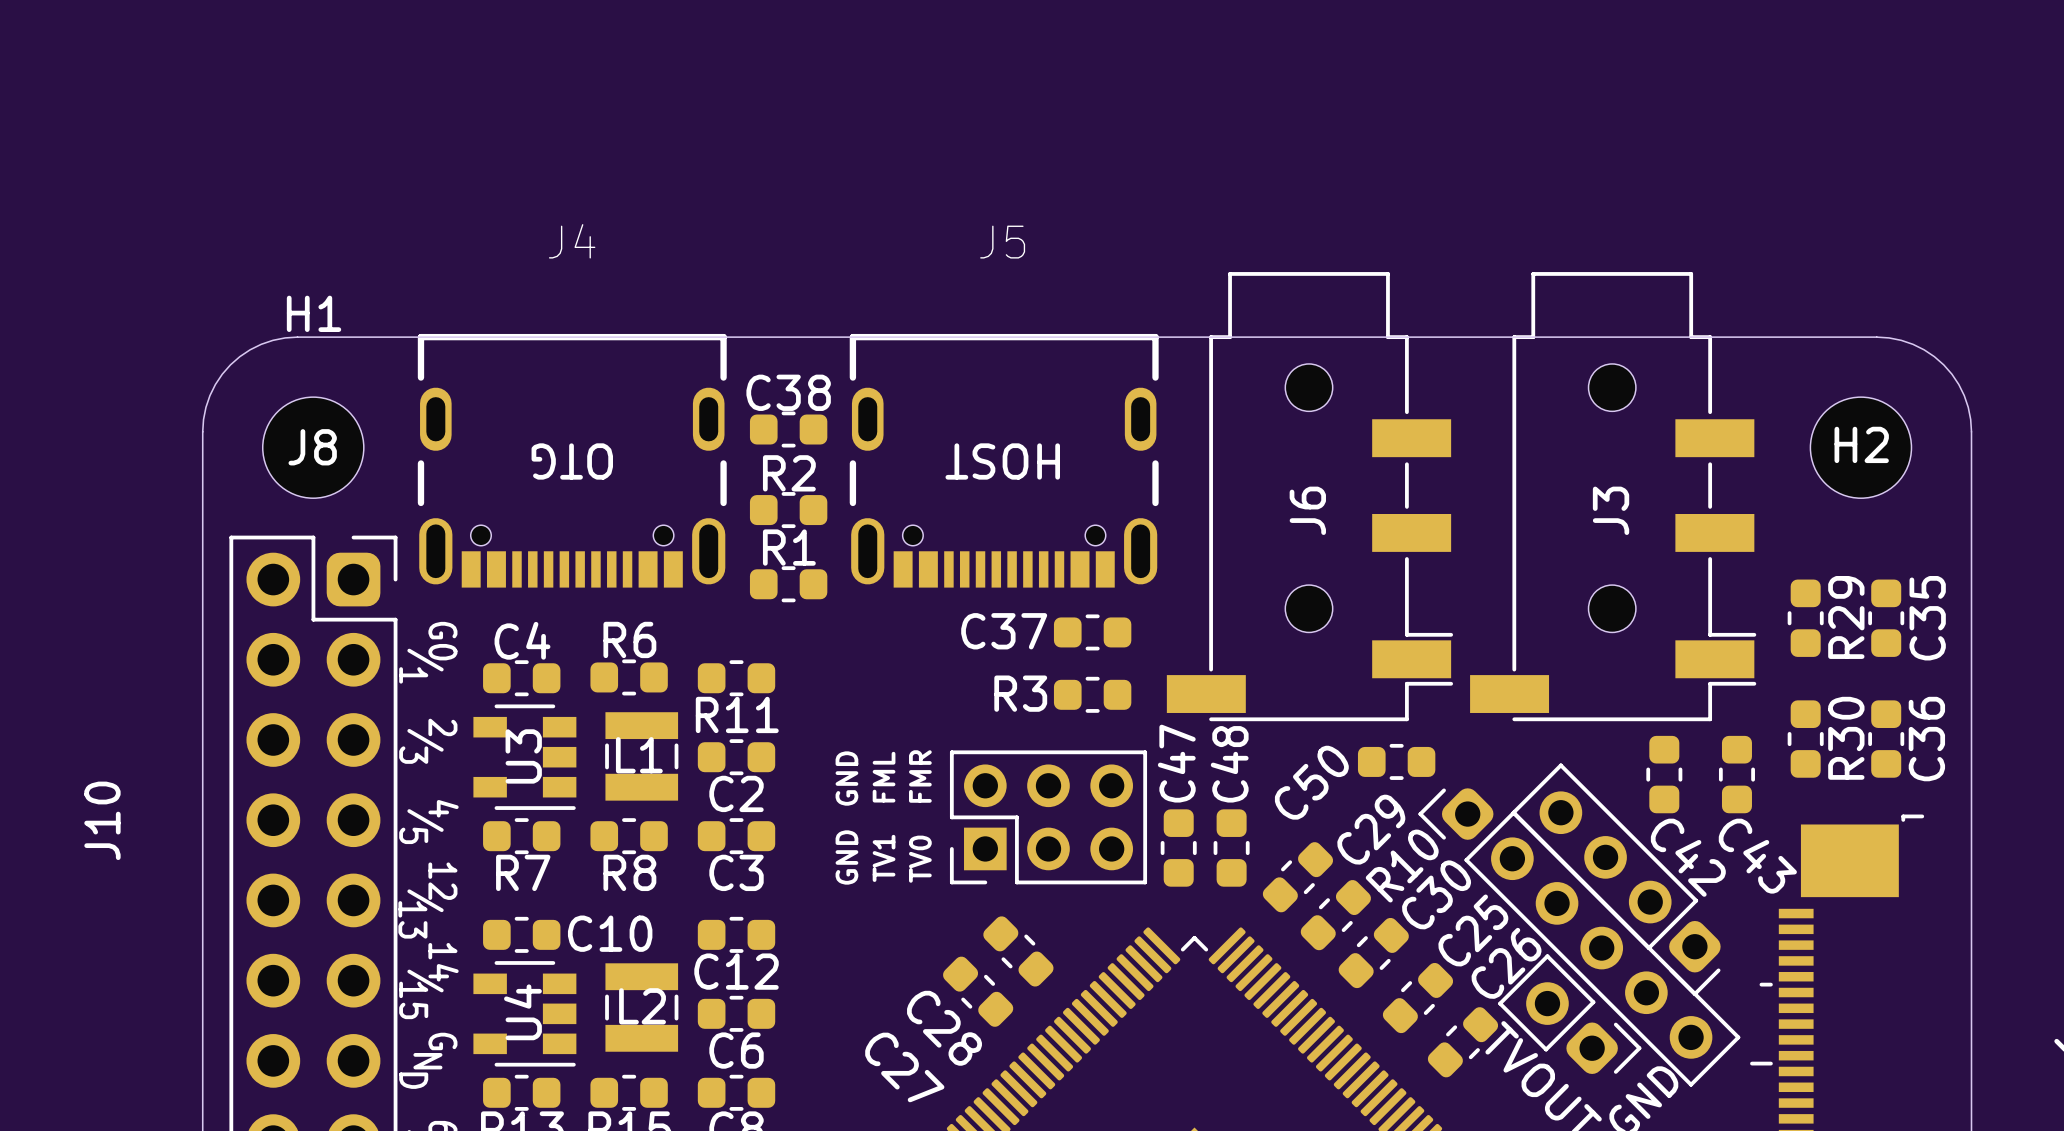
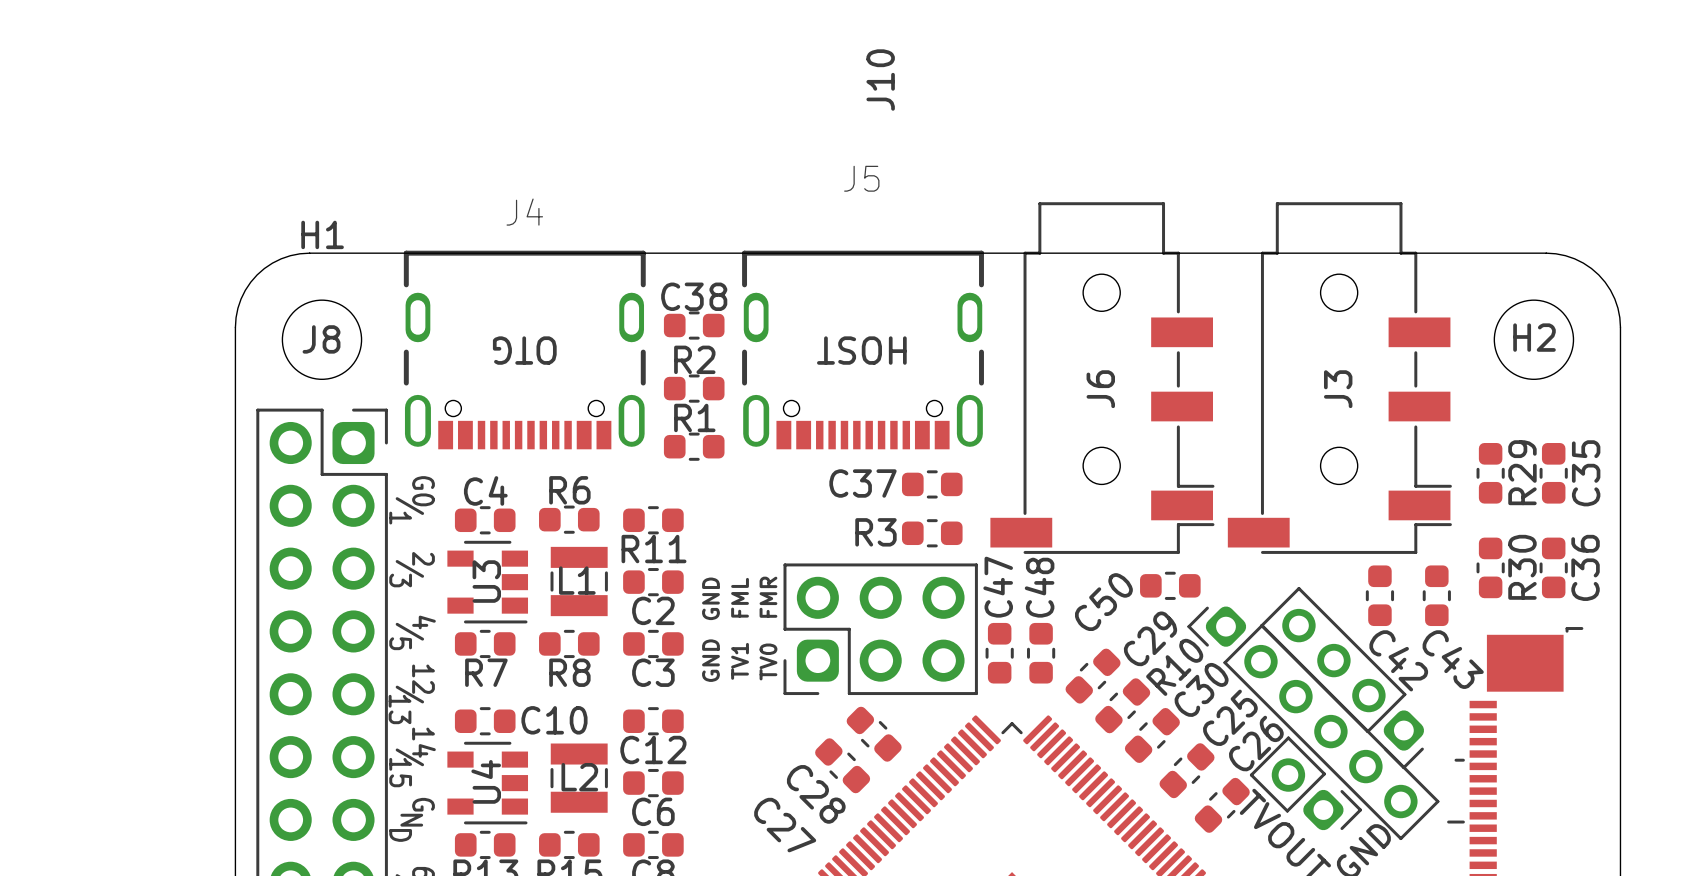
J4 name position: J4 (572, 241) -> J4 (524, 212)
J10 footprint: [949, 750, 1148, 885] -> [783, 563, 978, 696]
text: FMR (920, 776) -> none
text: FML (884, 777) -> FMR (768, 597)
text: none -> GND (710, 598)
text: GND (846, 778) -> FML (740, 597)
J10 name position: J10 (102, 820) -> J10 (880, 80)
text: none -> GND (710, 660)
text: GND (846, 857) -> TV1 (740, 661)
text: TV1 (884, 858) -> TV0 (768, 661)
text: TV0 (920, 859) -> none

